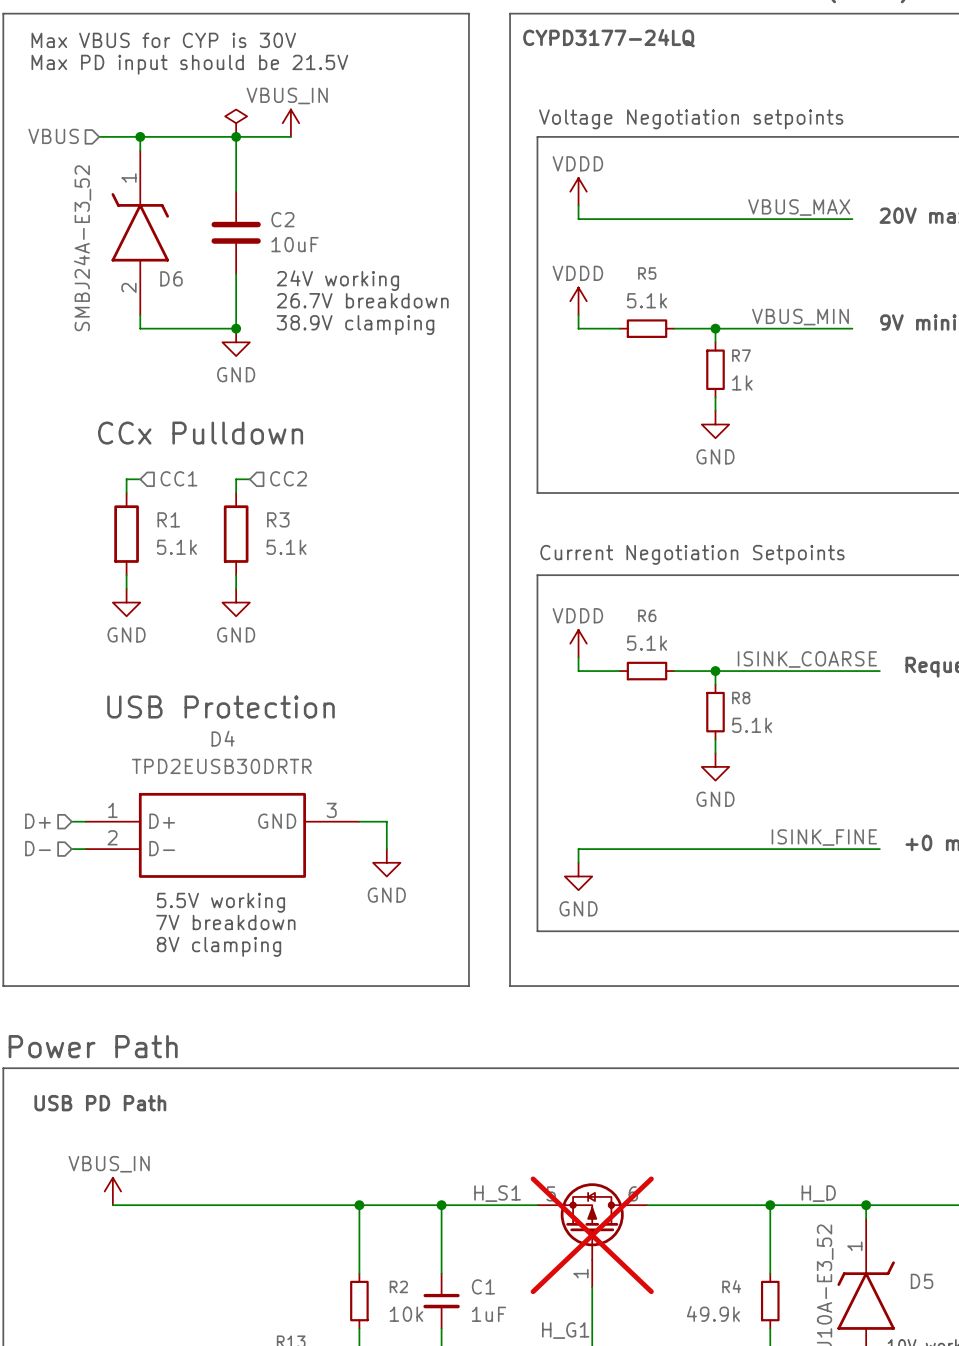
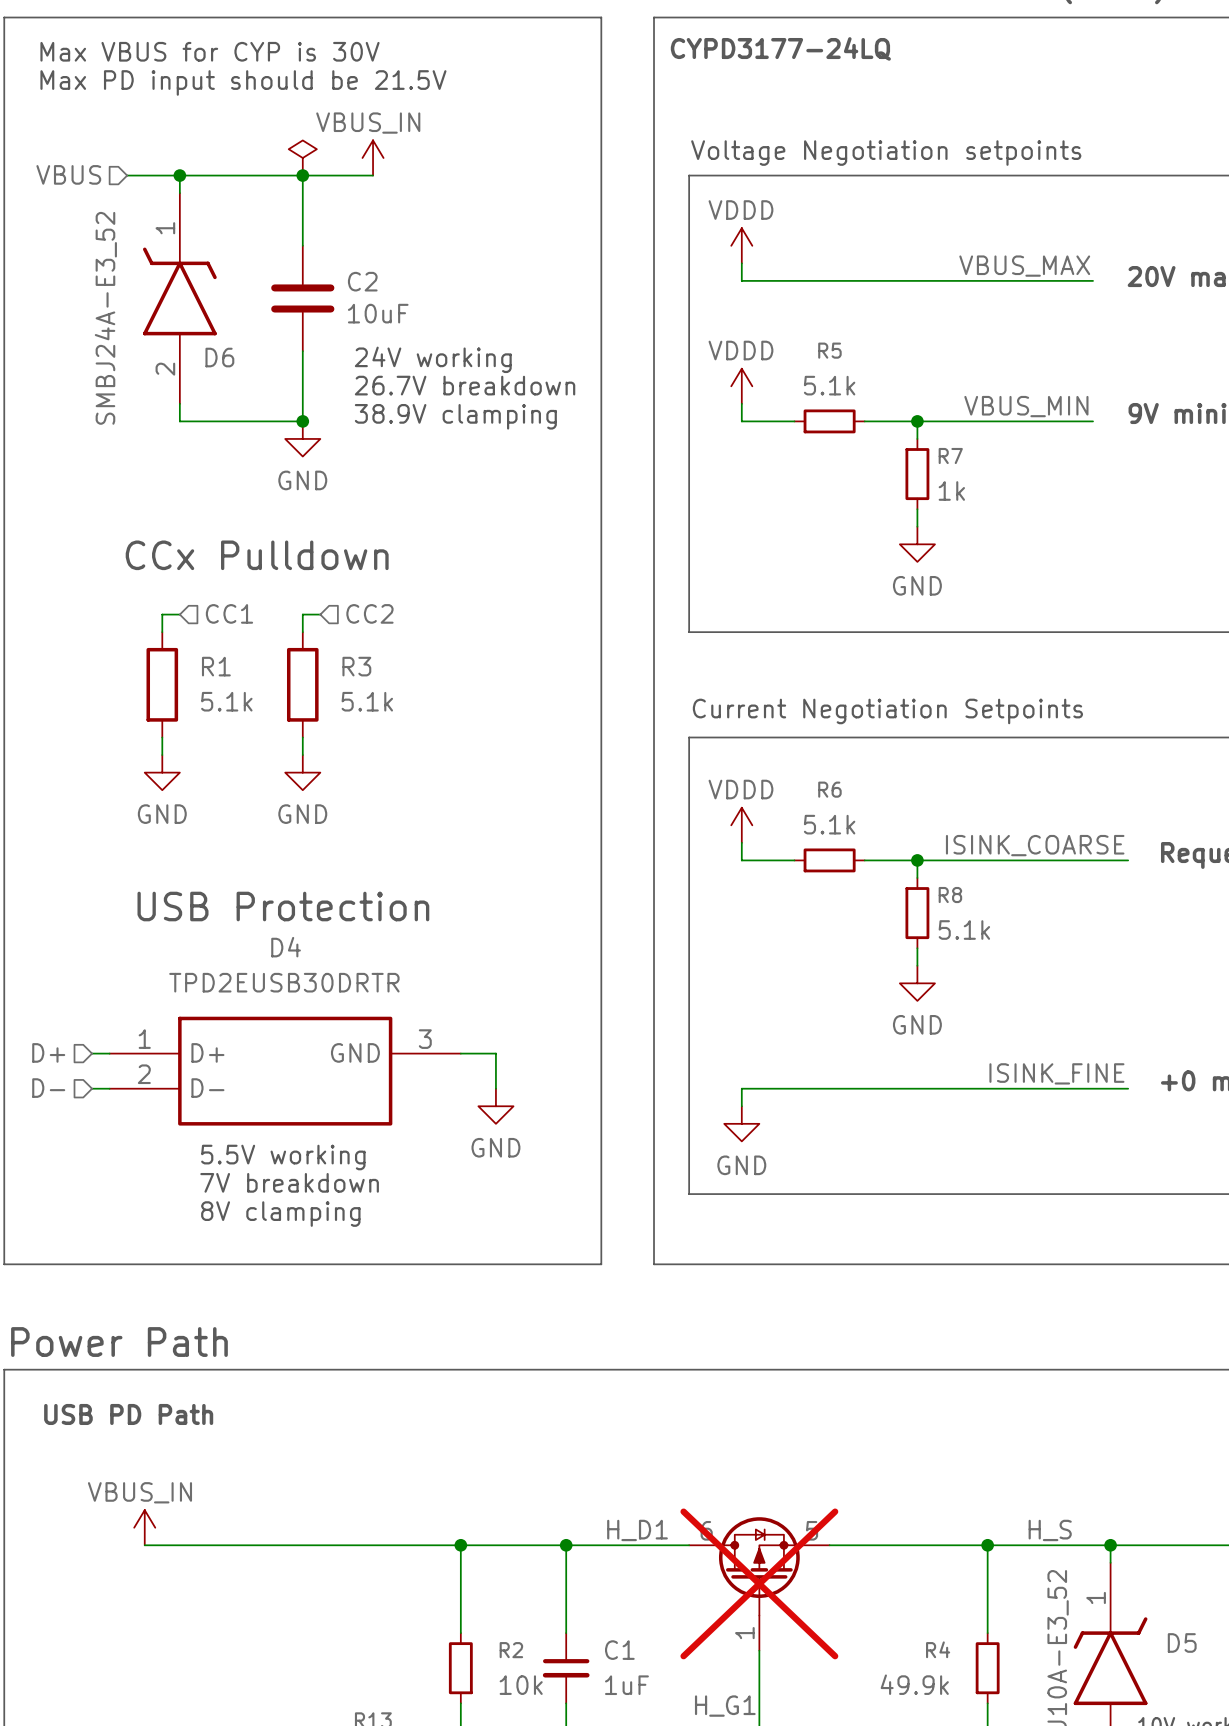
label: H_S1 (497, 1193) -> H_D1 (637, 1530)
label: H_D (818, 1193) -> H_S (1050, 1530)
part flip: as is (592, 1221) -> left-right (759, 1566)

